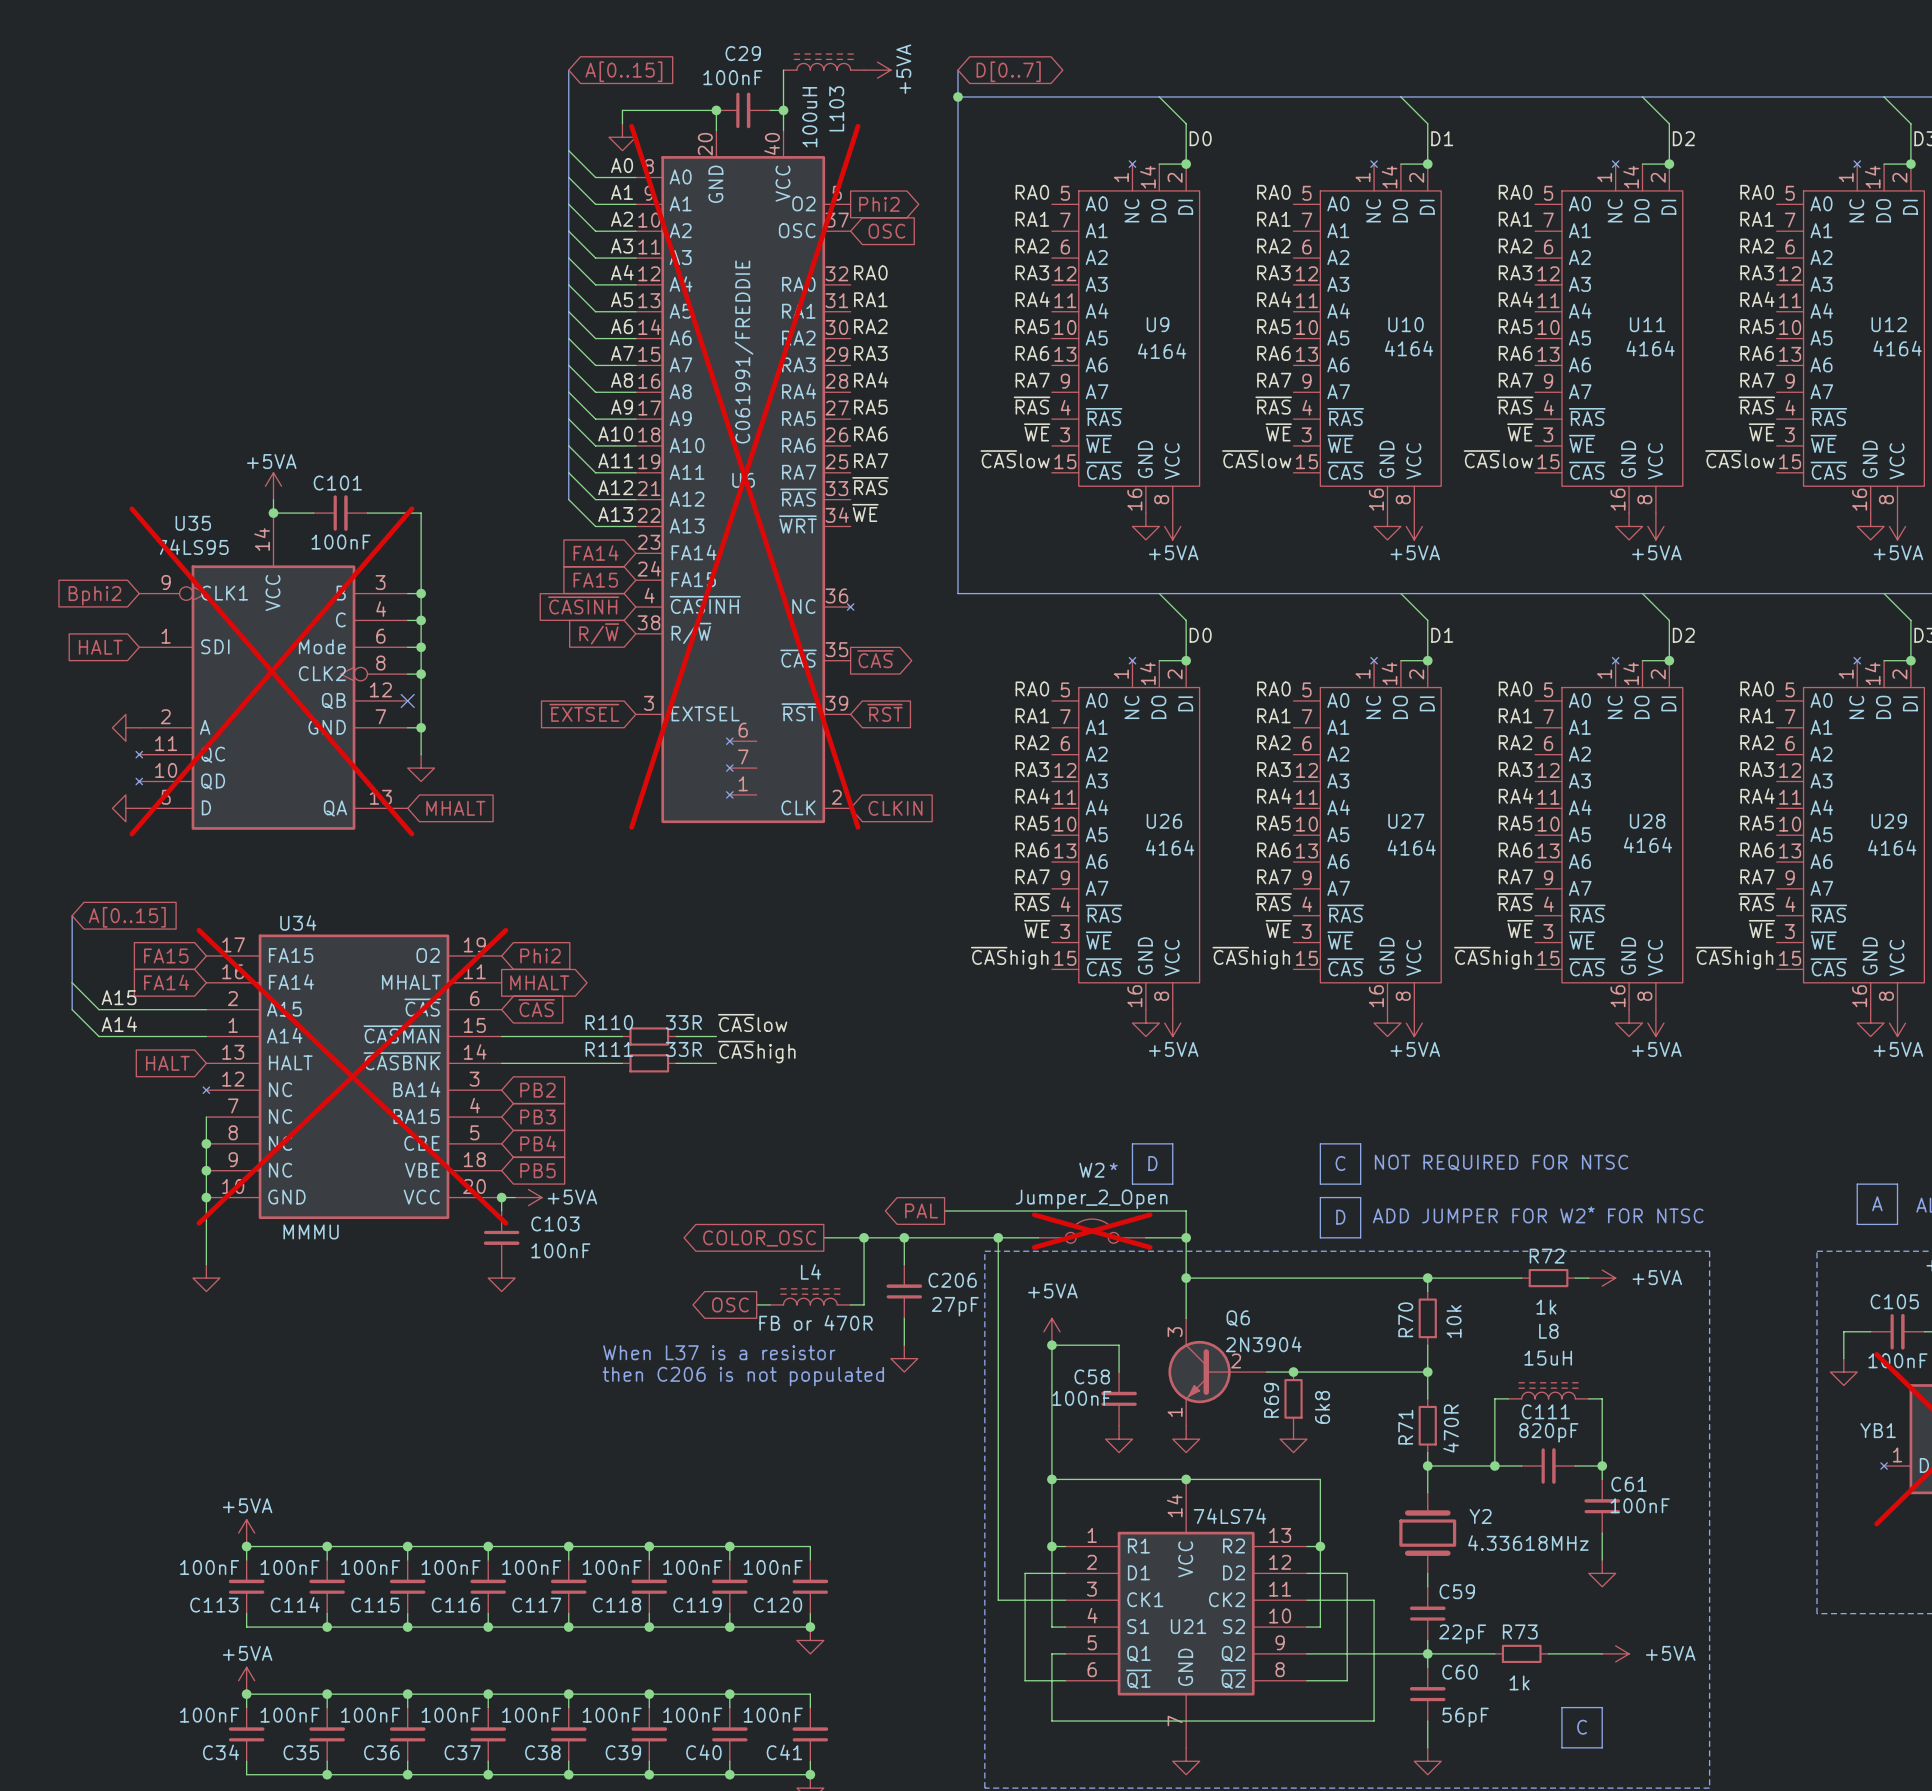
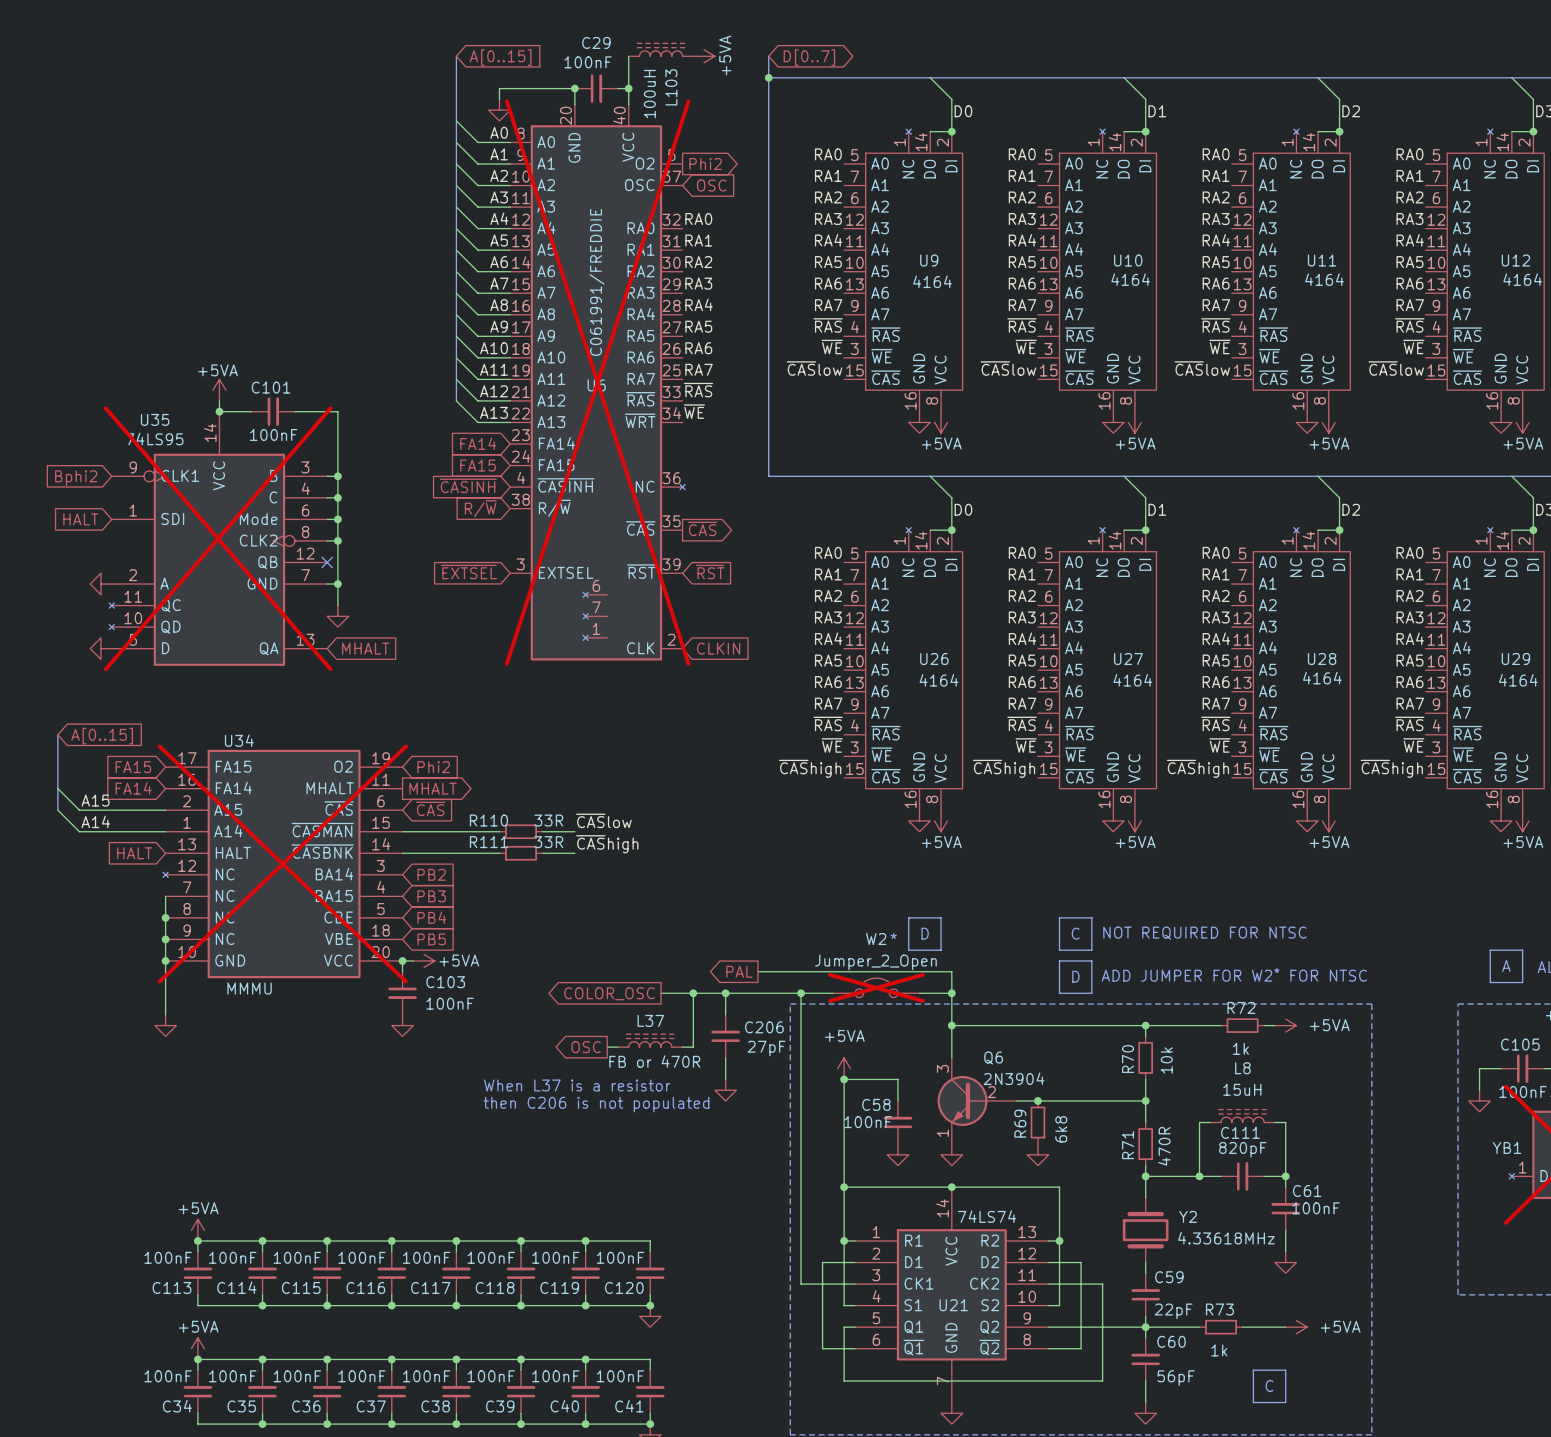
L4 name: L4 (810, 1271) -> L37 (650, 1020)

